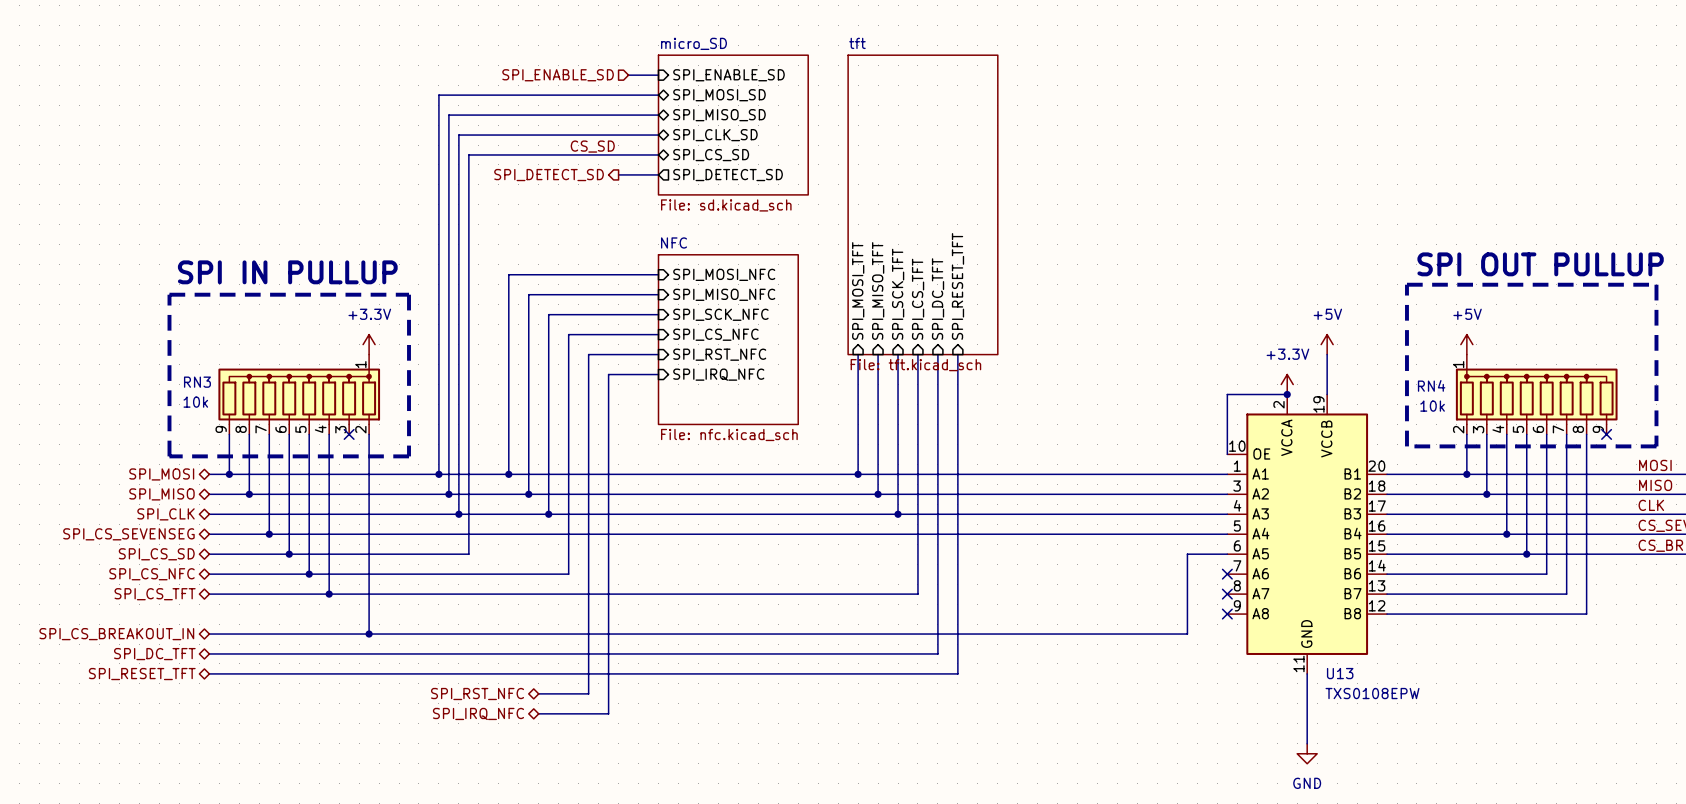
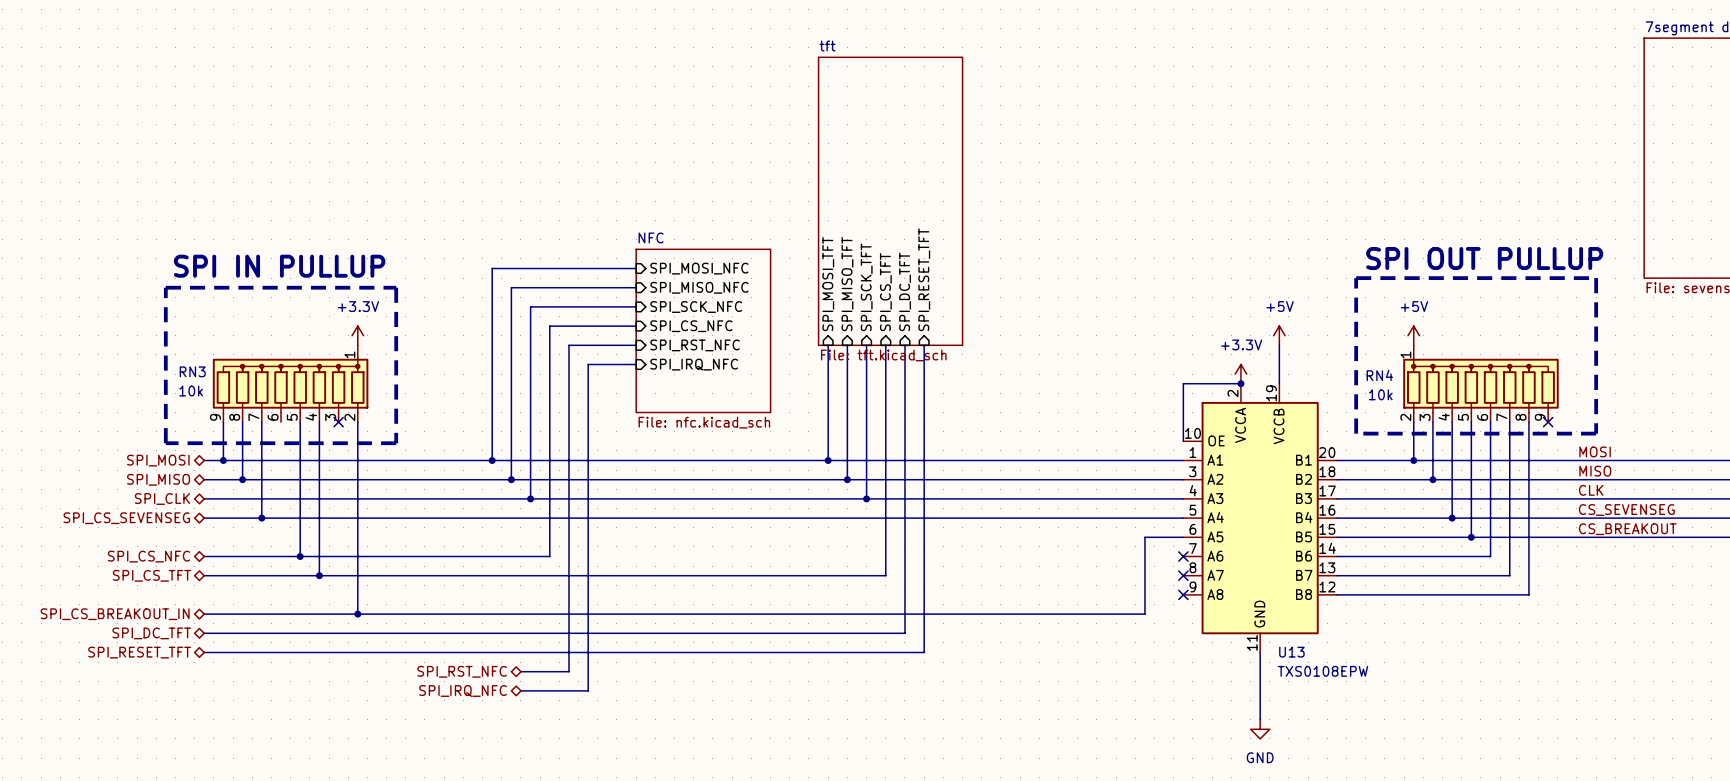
hierarchical label: SPI_ENABLE_SD (558, 75) -> none
wire: (628, 75) (658, 75) -> none
sheet pin: SPI_ENABLE_SD (728, 75) -> none
wire: (658, 95) (438, 95) (438, 474) -> none
sheet pin: SPI_MOSI_SD (719, 95) -> none
wire: (658, 115) (448, 115) (448, 494) -> none
sheet pin: SPI_MISO_SD (719, 115) -> none
sheet micro_SD: File: sd.kicad_sch (733, 125) -> none
wire: (658, 135) (458, 135) (458, 514) -> none
sheet pin: SPI_CLK_SD (715, 135) -> none
label: CS_SD (592, 146) -> none
wire: (658, 154) (468, 154) (468, 554) (209, 554) -> none
sheet pin: SPI_CS_SD (711, 155) -> none
wire: (618, 174) (658, 174) -> none
hierarchical label: SPI_DETECT_SD (549, 175) -> none
sheet pin: SPI_DETECT_SD (728, 175) -> none
wire: (289, 434) (289, 554) -> none
junction: (438, 474) -> none
junction: (448, 494) -> none
junction: (458, 514) -> none
hierarchical label: SPI_CS_SD (156, 554) -> none
junction: (289, 554) -> none

